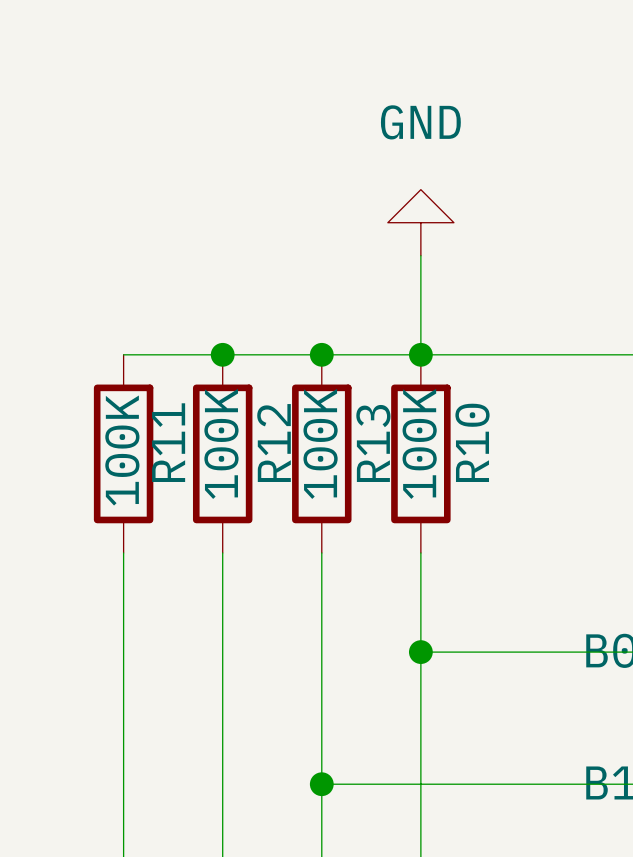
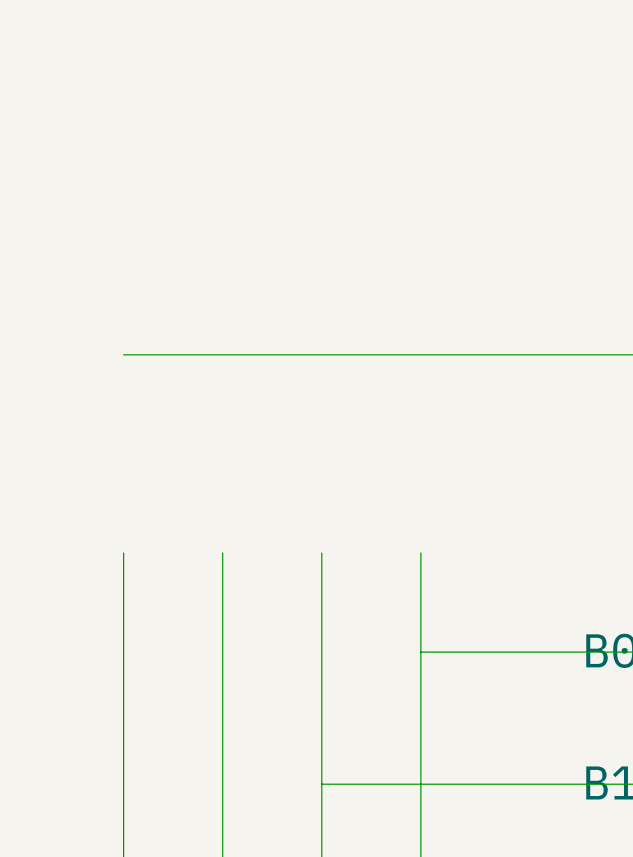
power symbol: GND (420, 222) -> none
wire: (420, 255) (420, 354) -> none
junction: (222, 354) -> none
junction: (321, 354) -> none
junction: (420, 354) -> none
R11: 100K (123, 453) -> none
R12: 100K (222, 453) -> none
R13: 100K (321, 453) -> none
R10: 100K (420, 453) -> none
junction: (420, 652) -> none
junction: (321, 784) -> none

